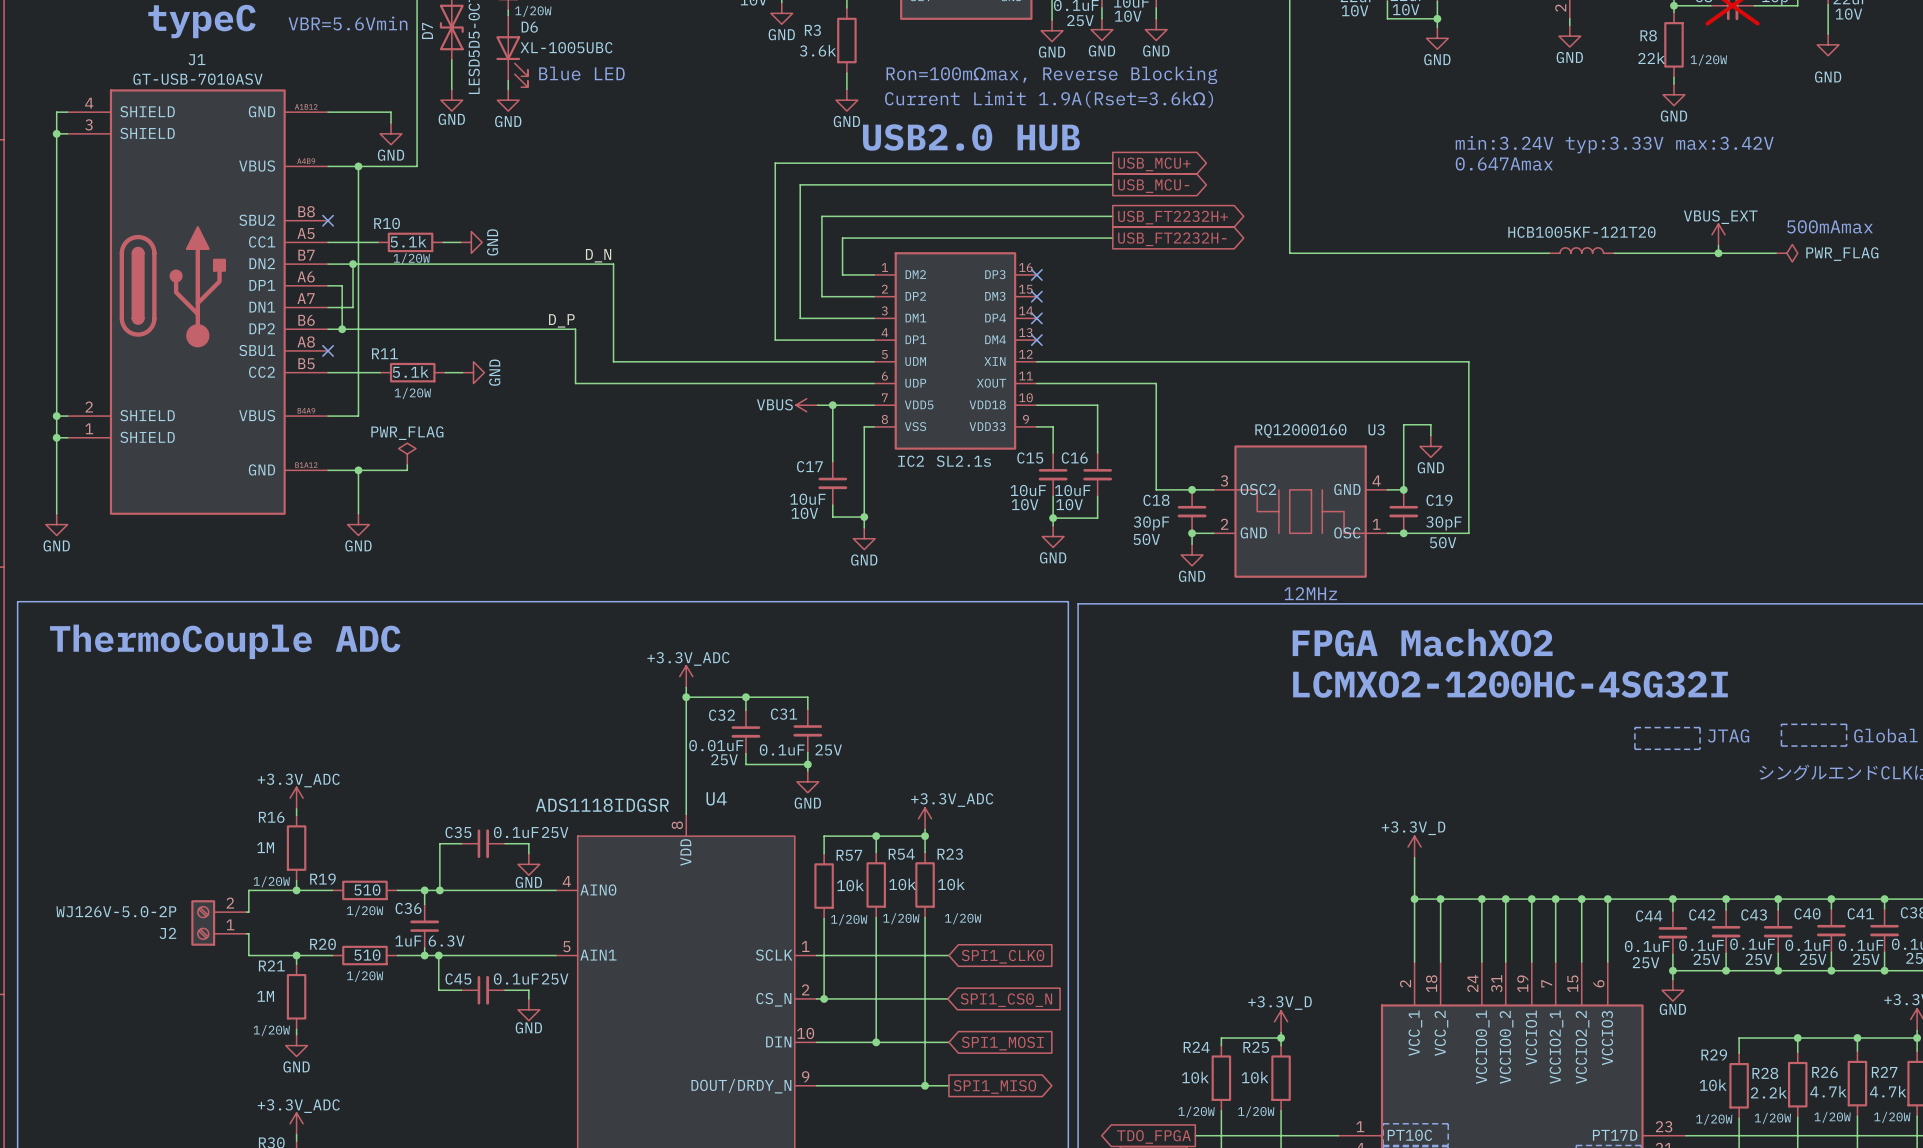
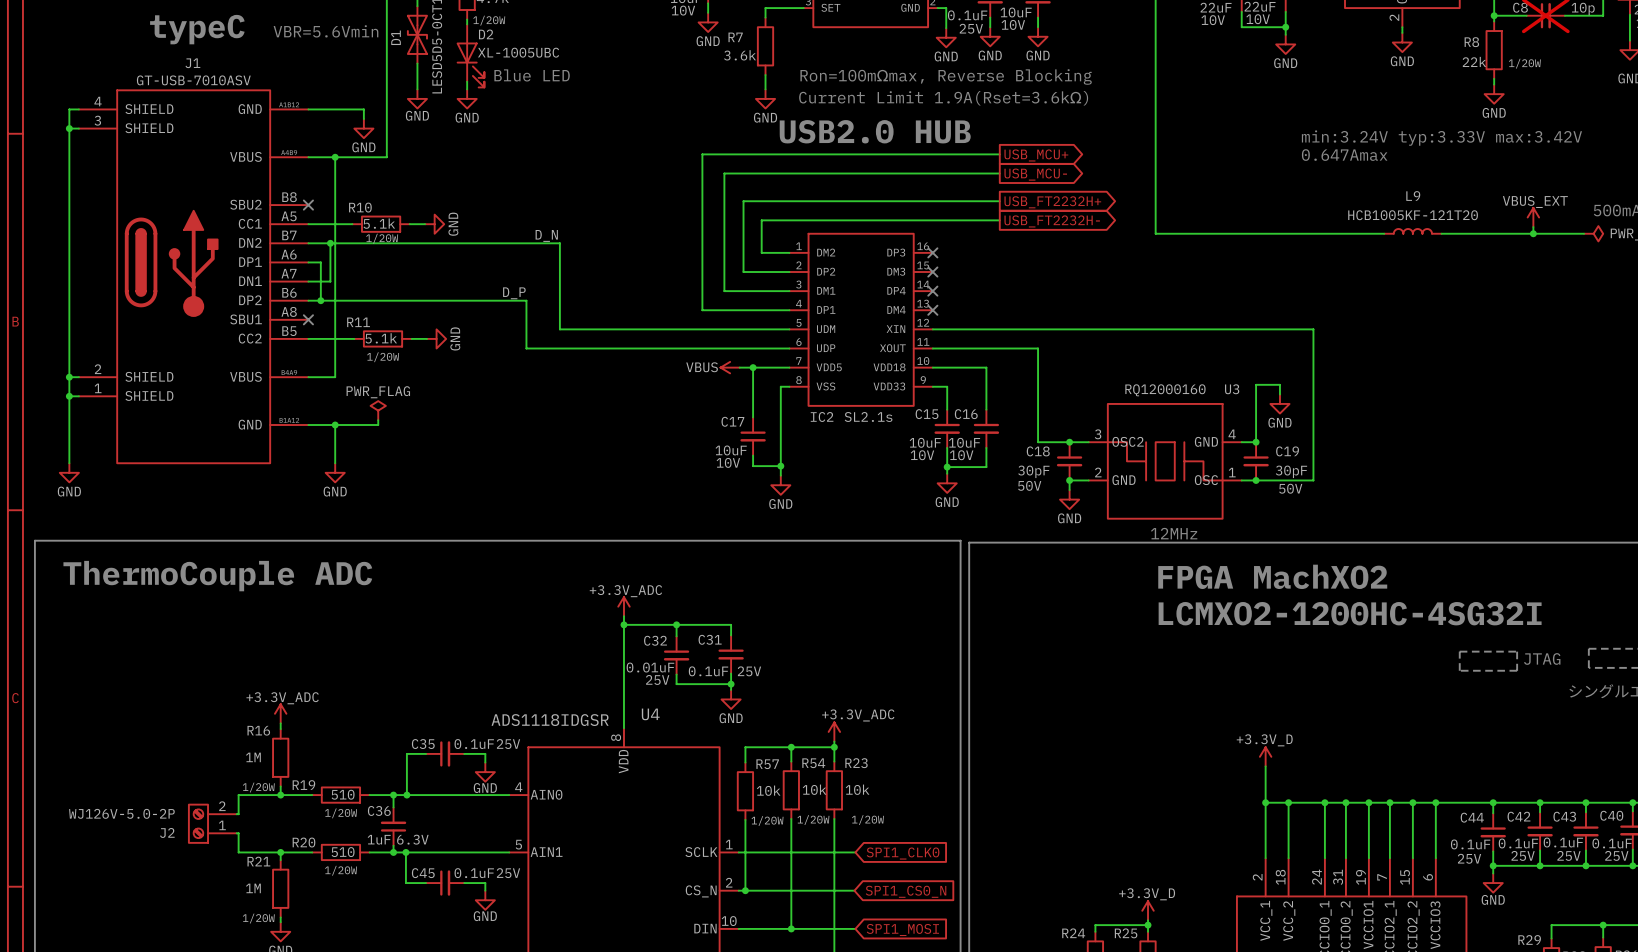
D6 name: D6 (529, 27) -> D2 (486, 34)
D7 name: D7 (427, 30) -> D1 (396, 37)
R3 name: R3 (812, 30) -> R7 (735, 37)
L9 name: none -> L9 (1413, 196)

